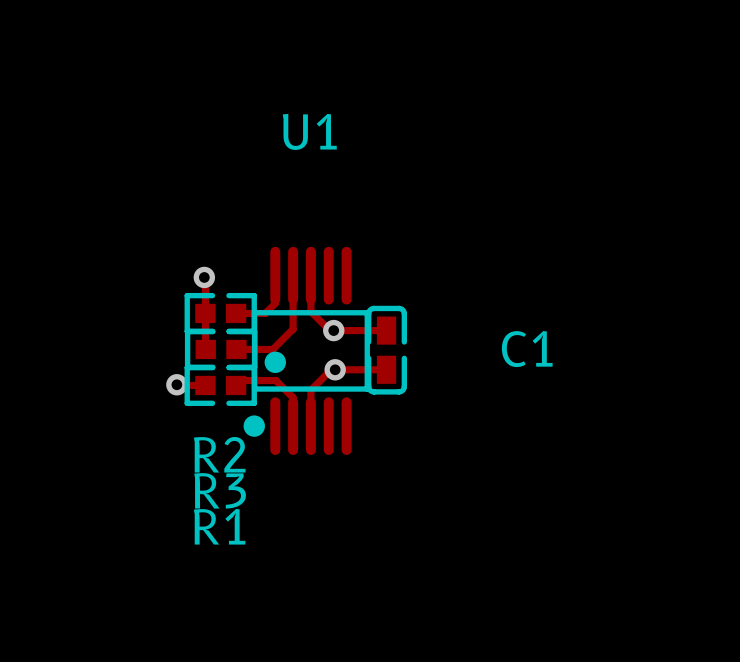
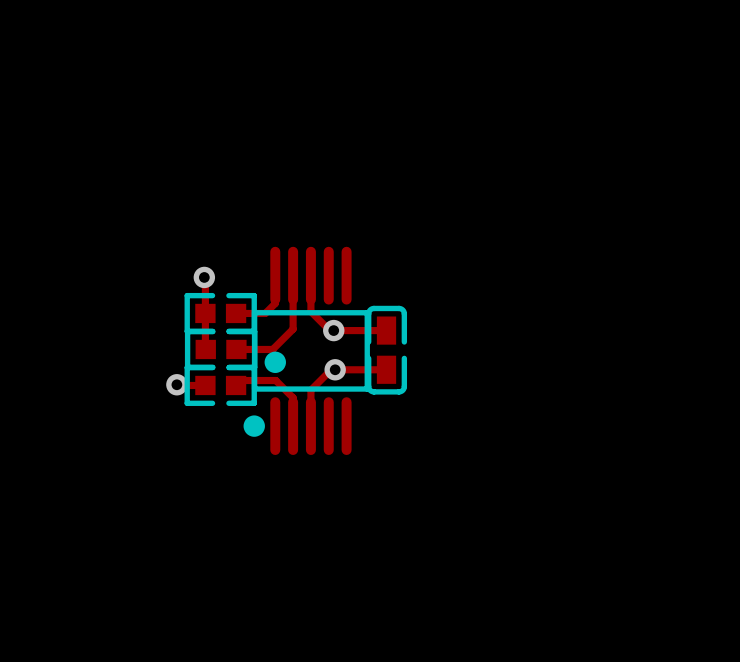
U1 name: U1 (309, 131) -> none
C1 name: C1 (527, 349) -> none
R2 name: R2 (219, 454) -> none
R3 name: R3 (220, 490) -> none
R1 name: R1 (219, 526) -> none

